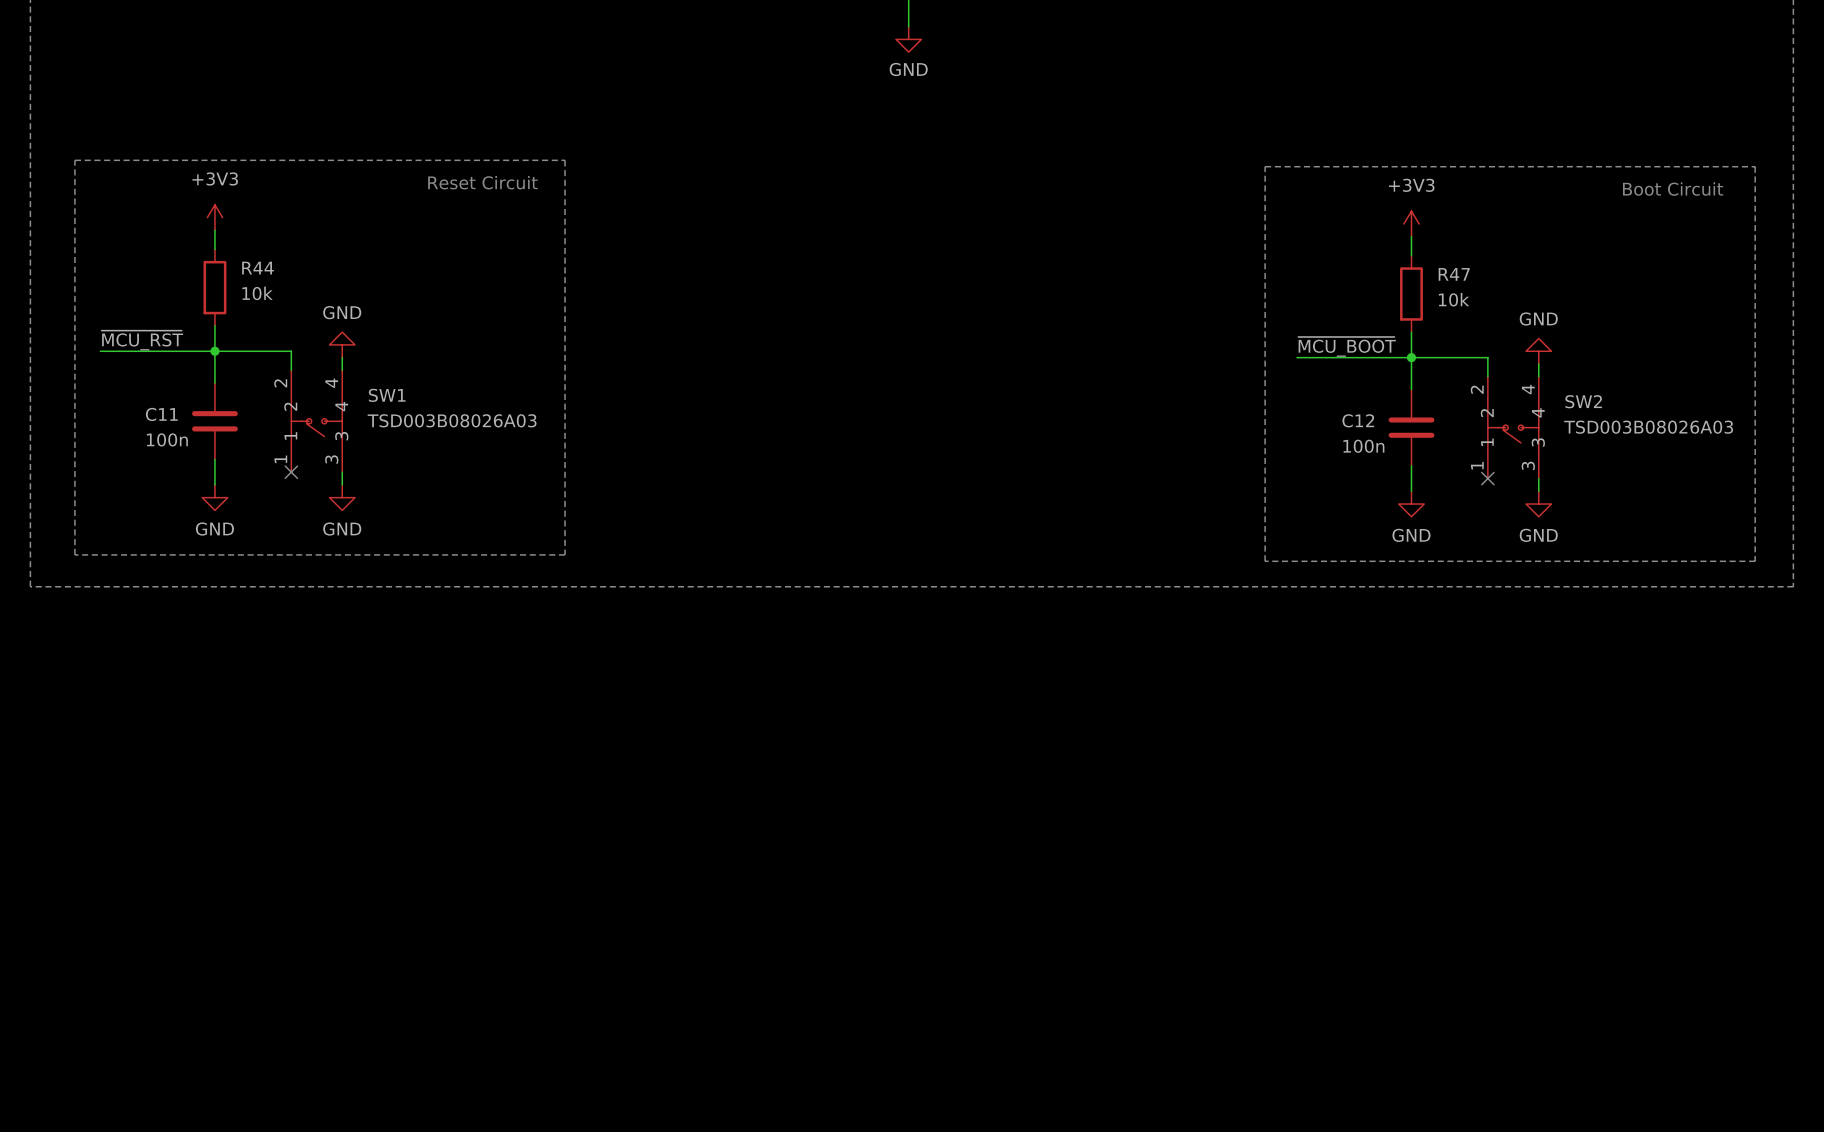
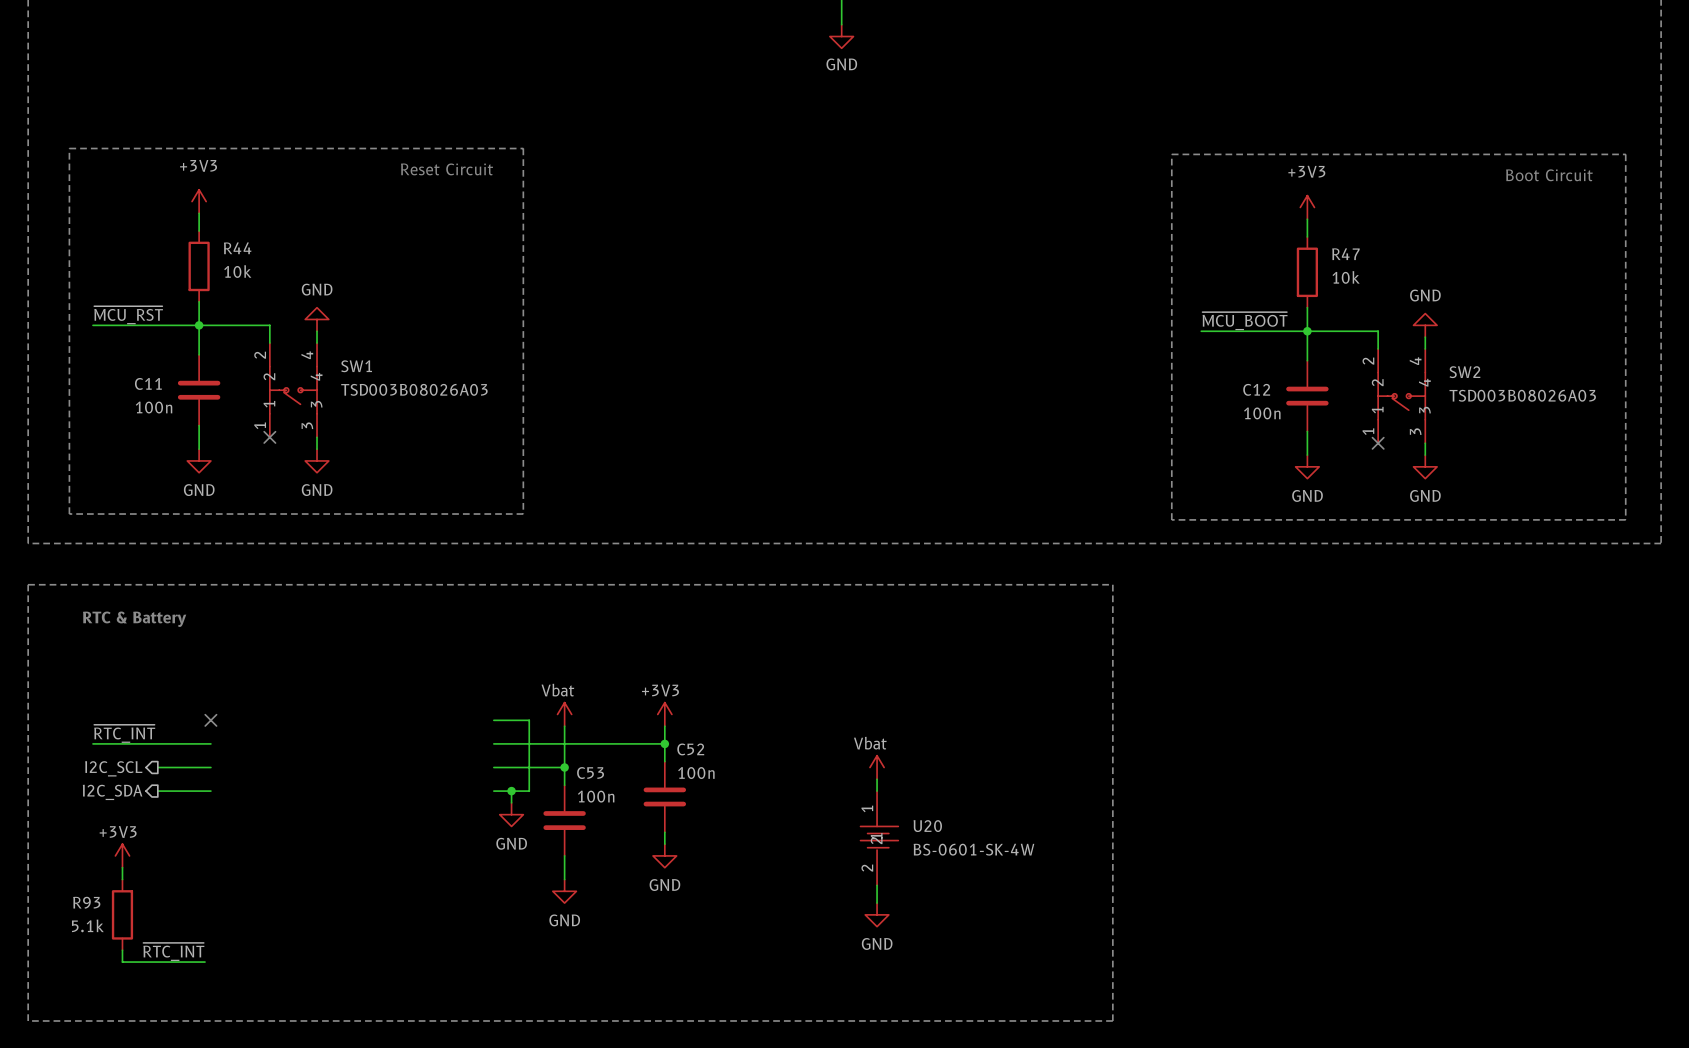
line: none -> (28, 584) (1112, 584) (1112, 1020) (28, 1020) (28, 584)
text: none -> RTC & Battery (134, 619)
power symbol: none -> Vbat (564, 714)
power symbol: none -> +3V3 (664, 714)
no-connect mark: none -> (210, 720)
wire: none -> (493, 720) (529, 720) (529, 791) (493, 791)
wire: none -> (564, 726) (564, 785)
wire: none -> (664, 726) (664, 761)
label: none -> ~{RTC_INT} (124, 733)
wire: none -> (93, 743) (210, 743)
wire: none -> (493, 743) (664, 743)
junction: none -> (664, 743)
wire: none -> (157, 767) (210, 767)
wire: none -> (493, 767) (564, 767)
junction: none -> (564, 767)
power symbol: none -> Vbat (877, 767)
hierarchical label: none -> I2C_SCL (113, 768)
wire: none -> (877, 779) (877, 791)
wire: none -> (157, 791) (210, 791)
wire: none -> (511, 791) (511, 802)
junction: none -> (511, 791)
hierarchical label: none -> I2C_SDA (112, 792)
C52: none -> 100n (664, 796)
power symbol: none -> GND (511, 814)
C53: none -> 100n (564, 820)
wire: none -> (664, 832) (664, 844)
U20: none -> BS-0601-SK-4W (879, 838)
power symbol: none -> +3V3 (122, 855)
wire: none -> (564, 855) (564, 879)
power symbol: none -> GND (664, 855)
wire: none -> (122, 867) (122, 879)
wire: none -> (877, 885) (877, 903)
power symbol: none -> GND (564, 891)
R93: none -> 5.1k (122, 914)
power symbol: none -> GND (877, 914)
wire: none -> (122, 950) (122, 962) (205, 962)
label: none -> ~{RTC_INT} (173, 951)

